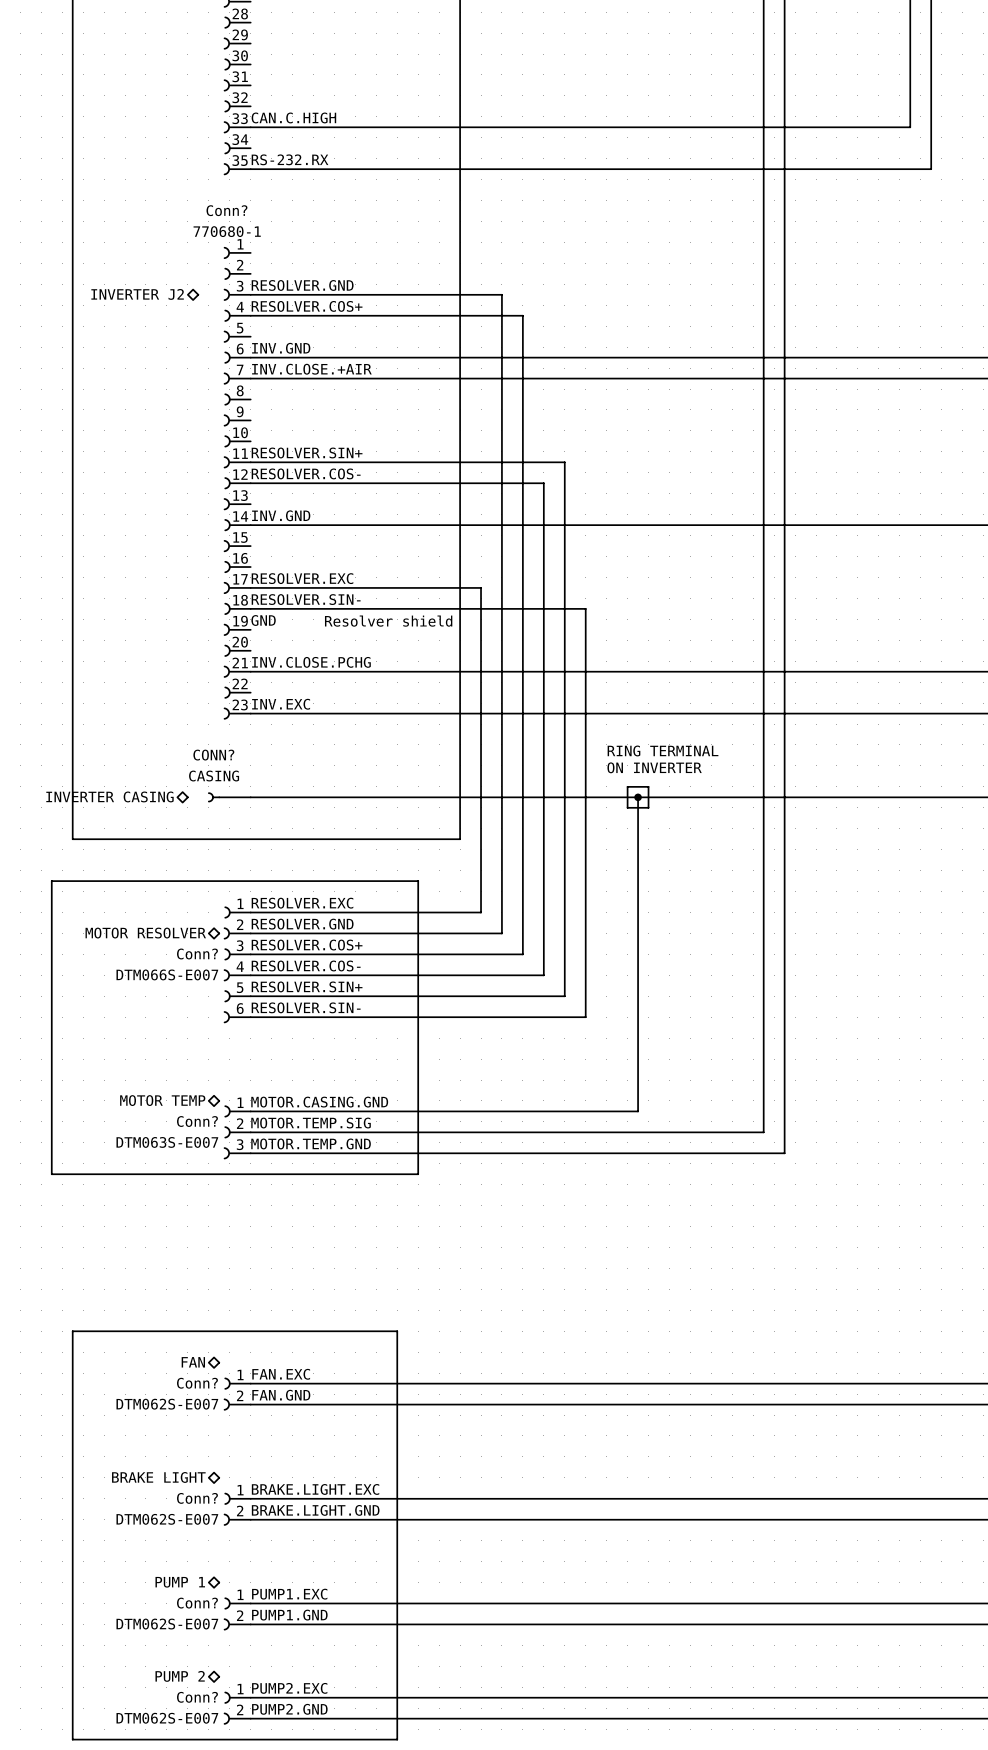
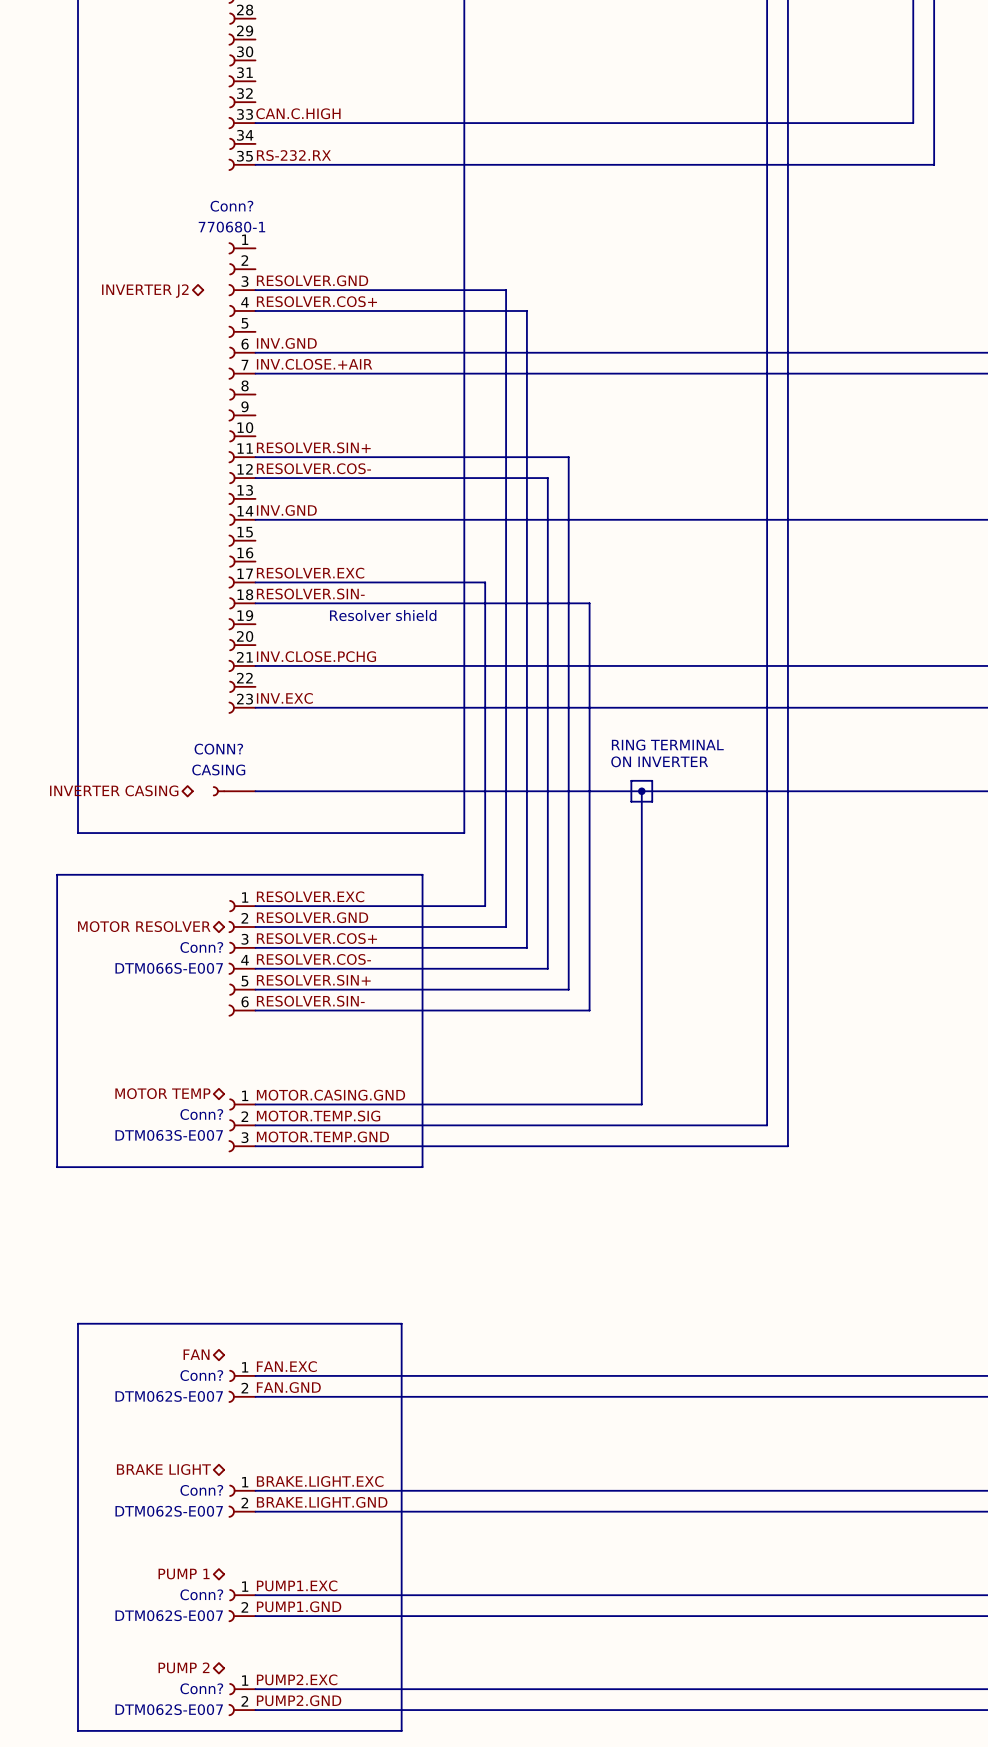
label: GND (263, 620) -> none

